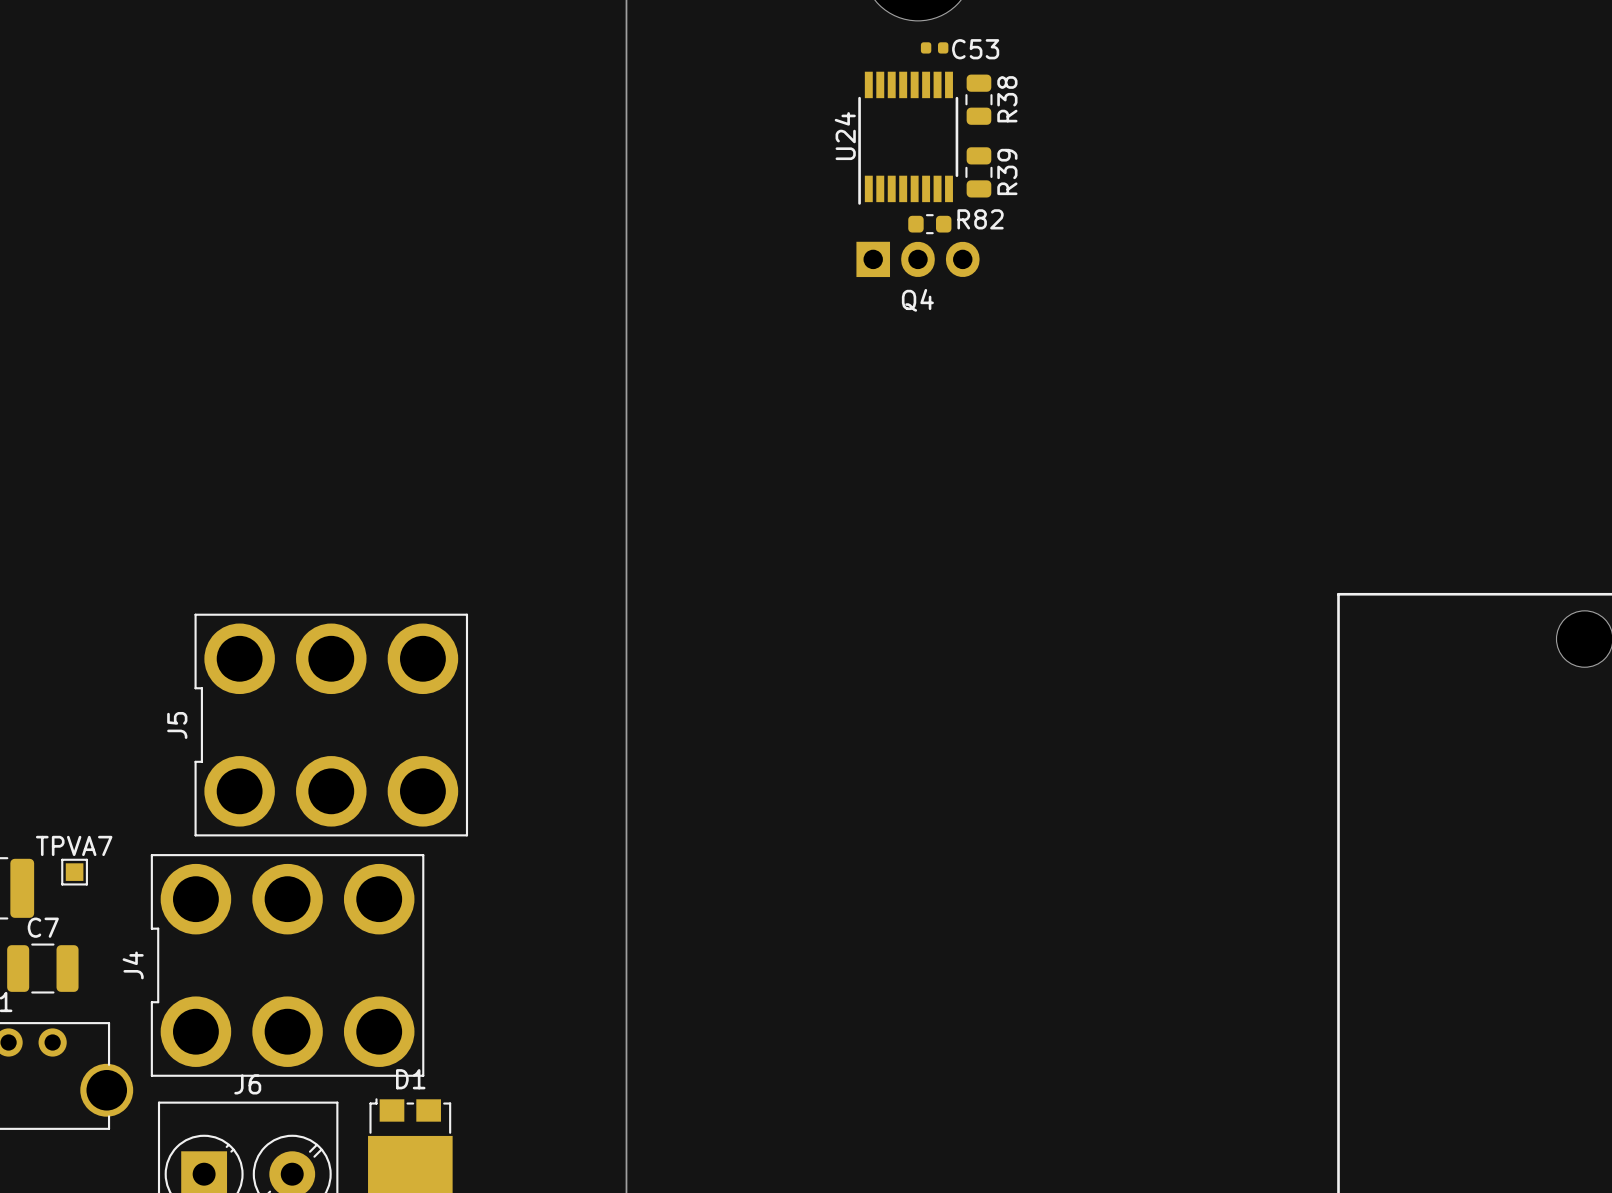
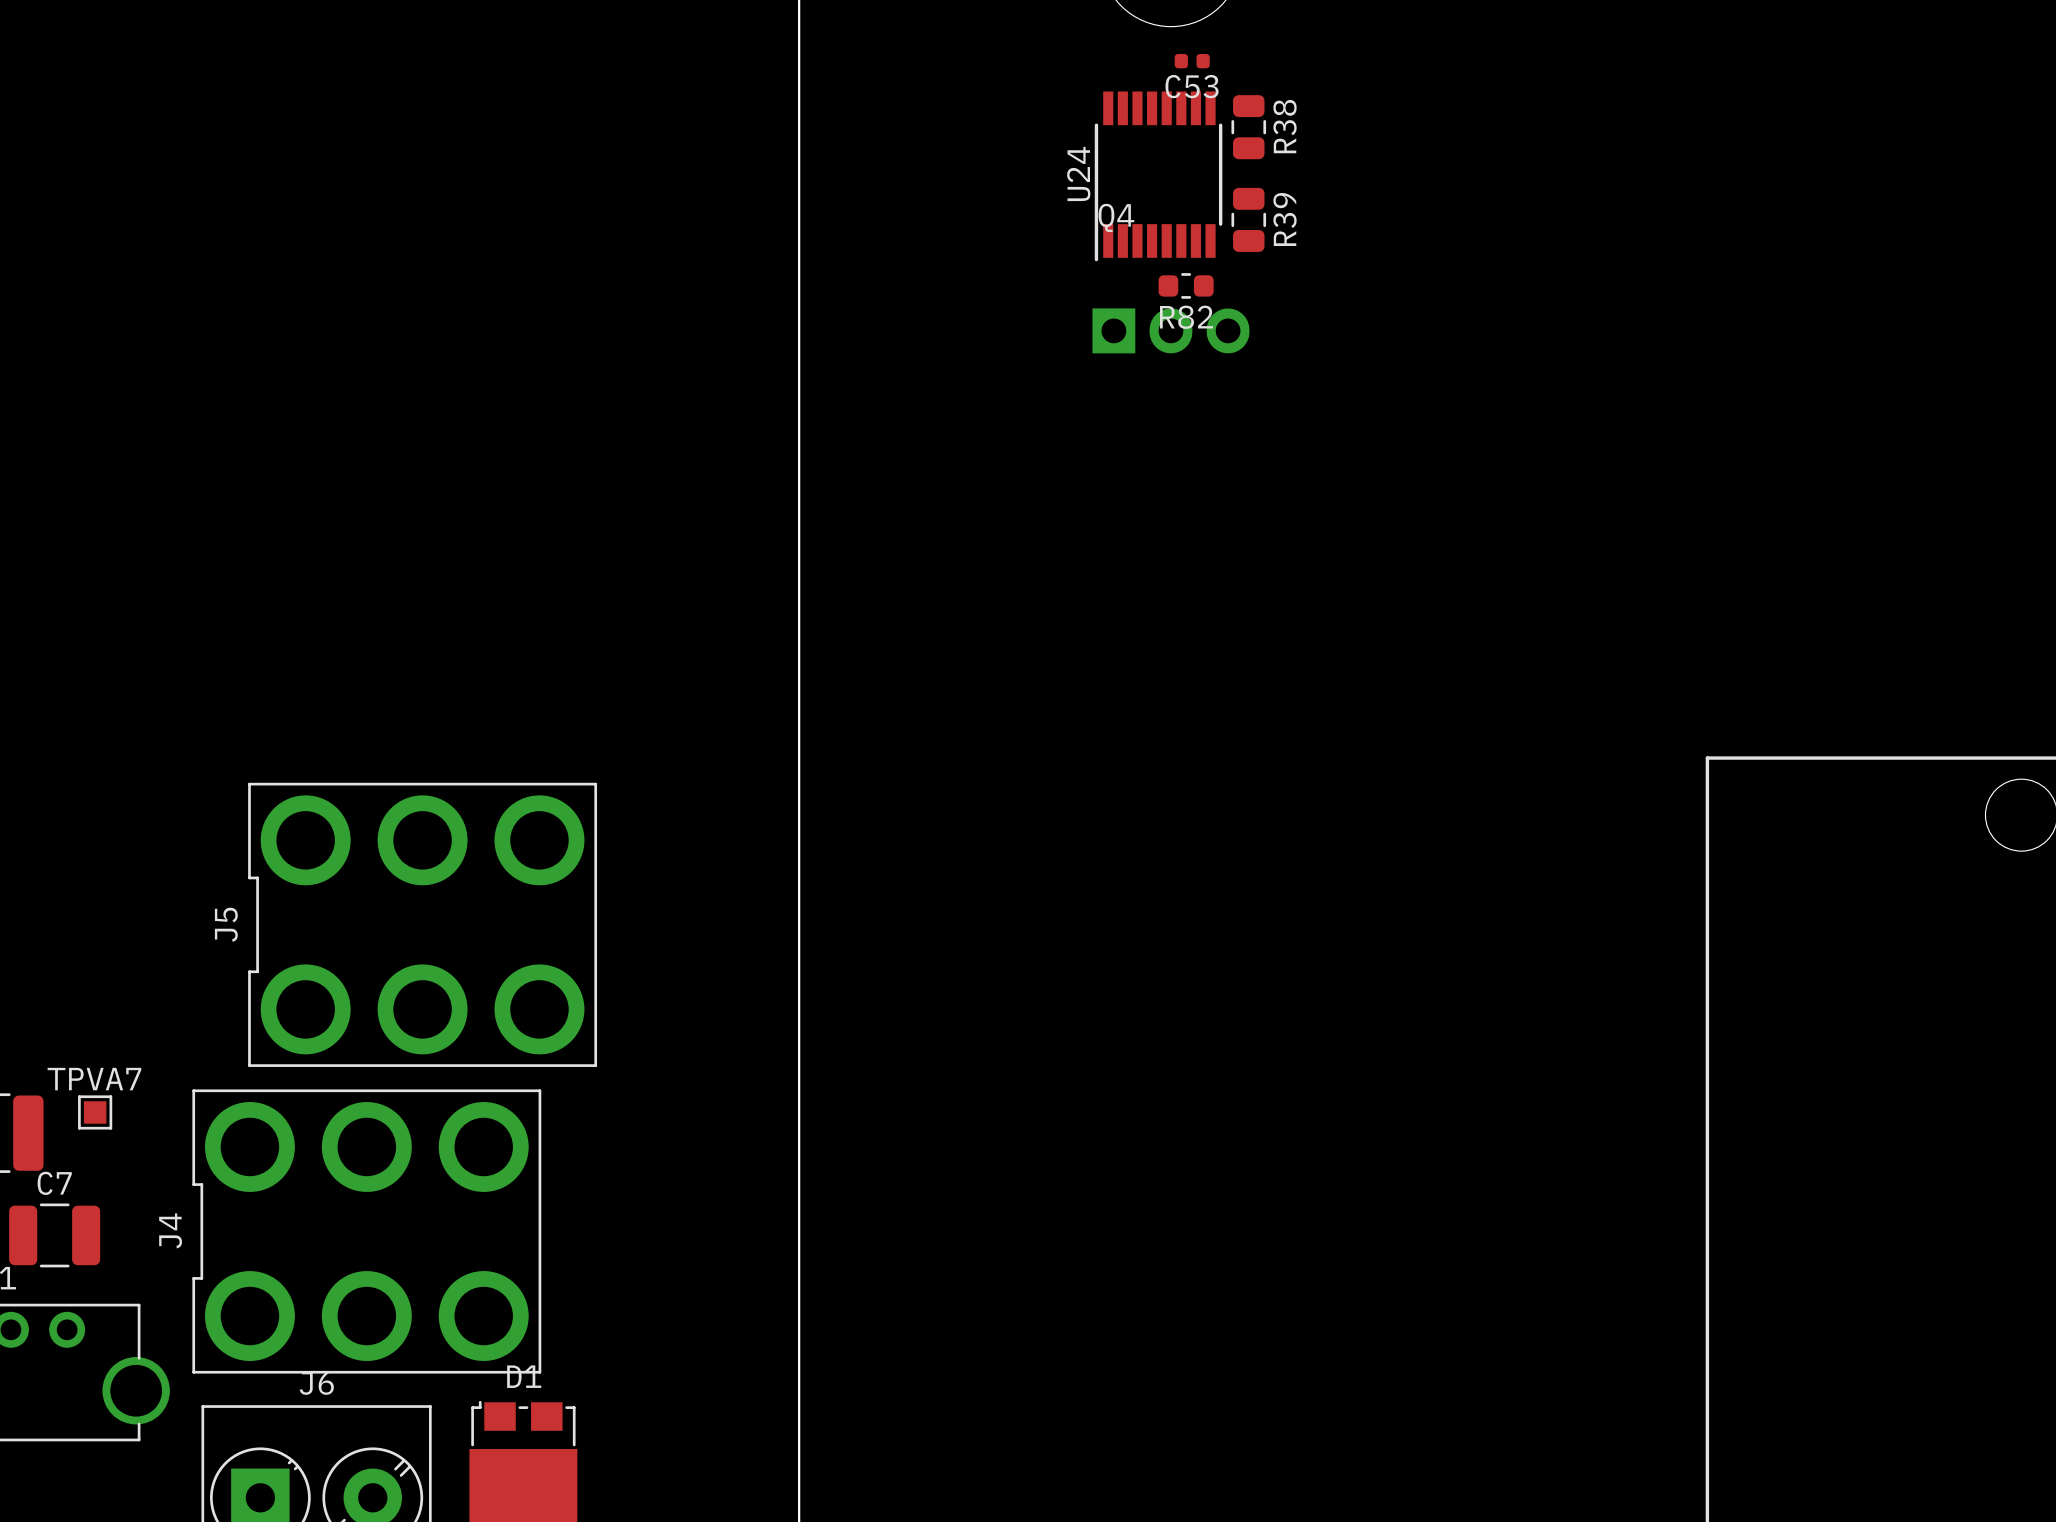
C53 name position: C53 (975, 49) -> C53 (1192, 86)
R82 name position: R82 (980, 219) -> R82 (1186, 317)
Q4 name position: Q4 (917, 300) -> Q4 (1116, 217)

